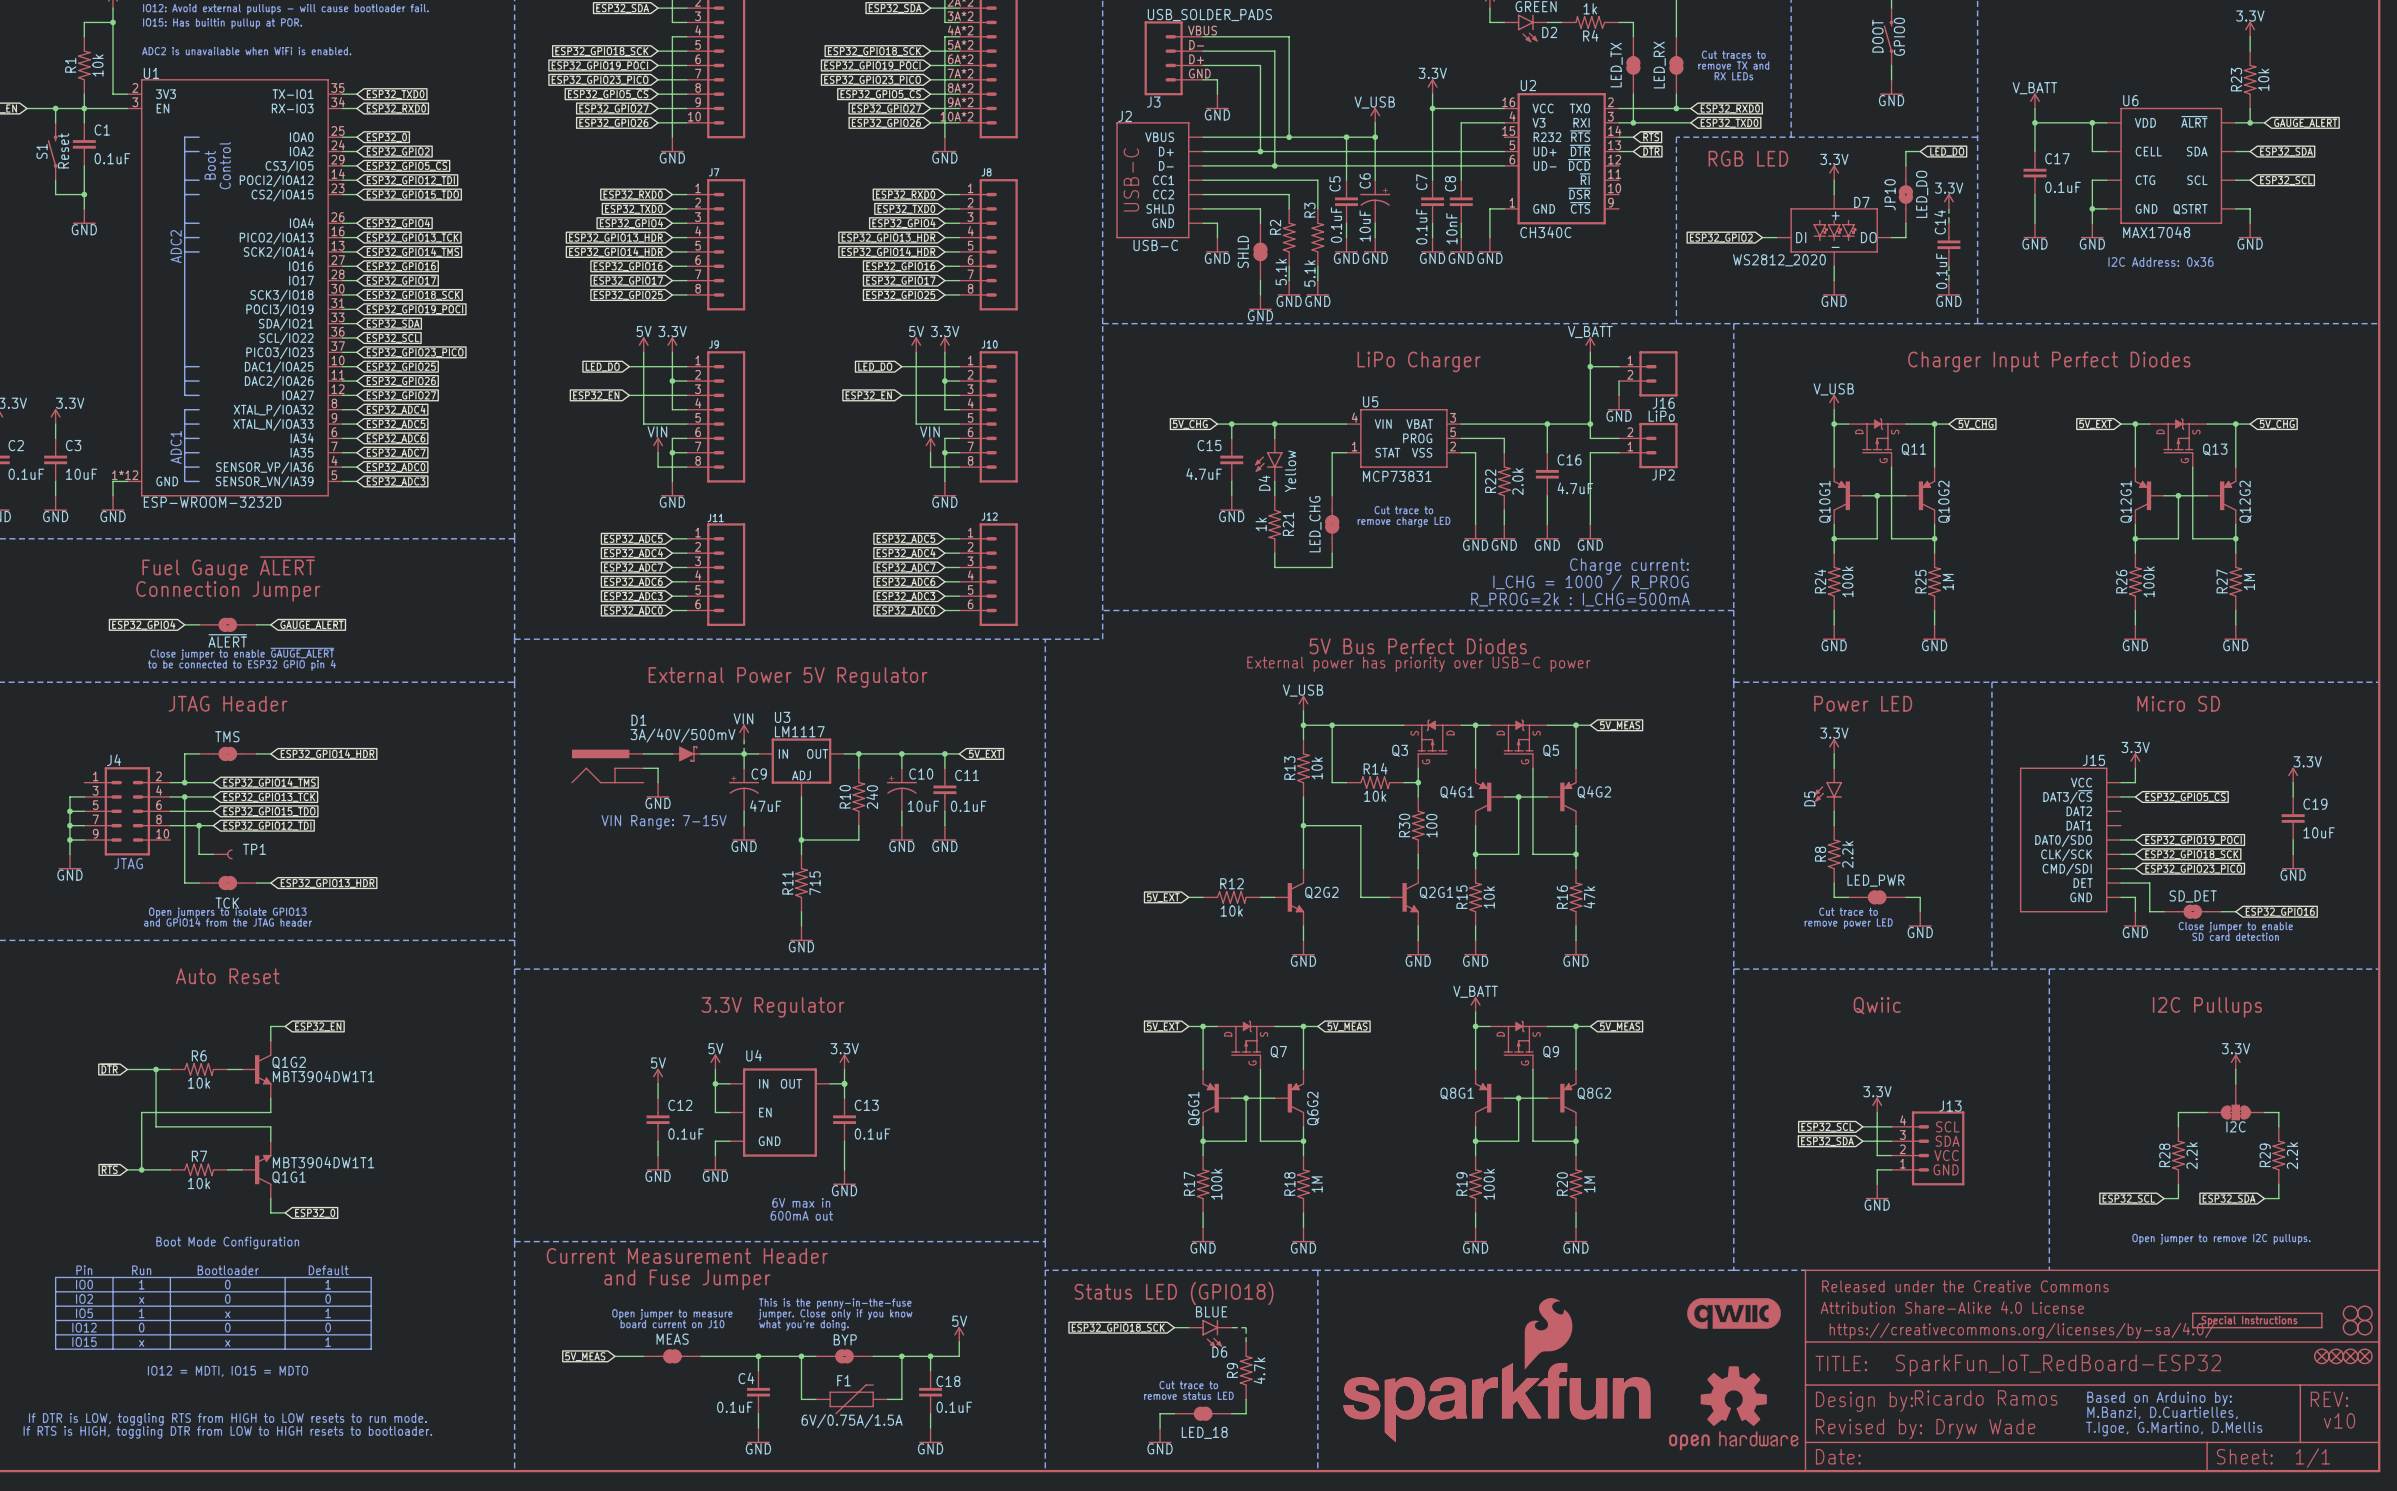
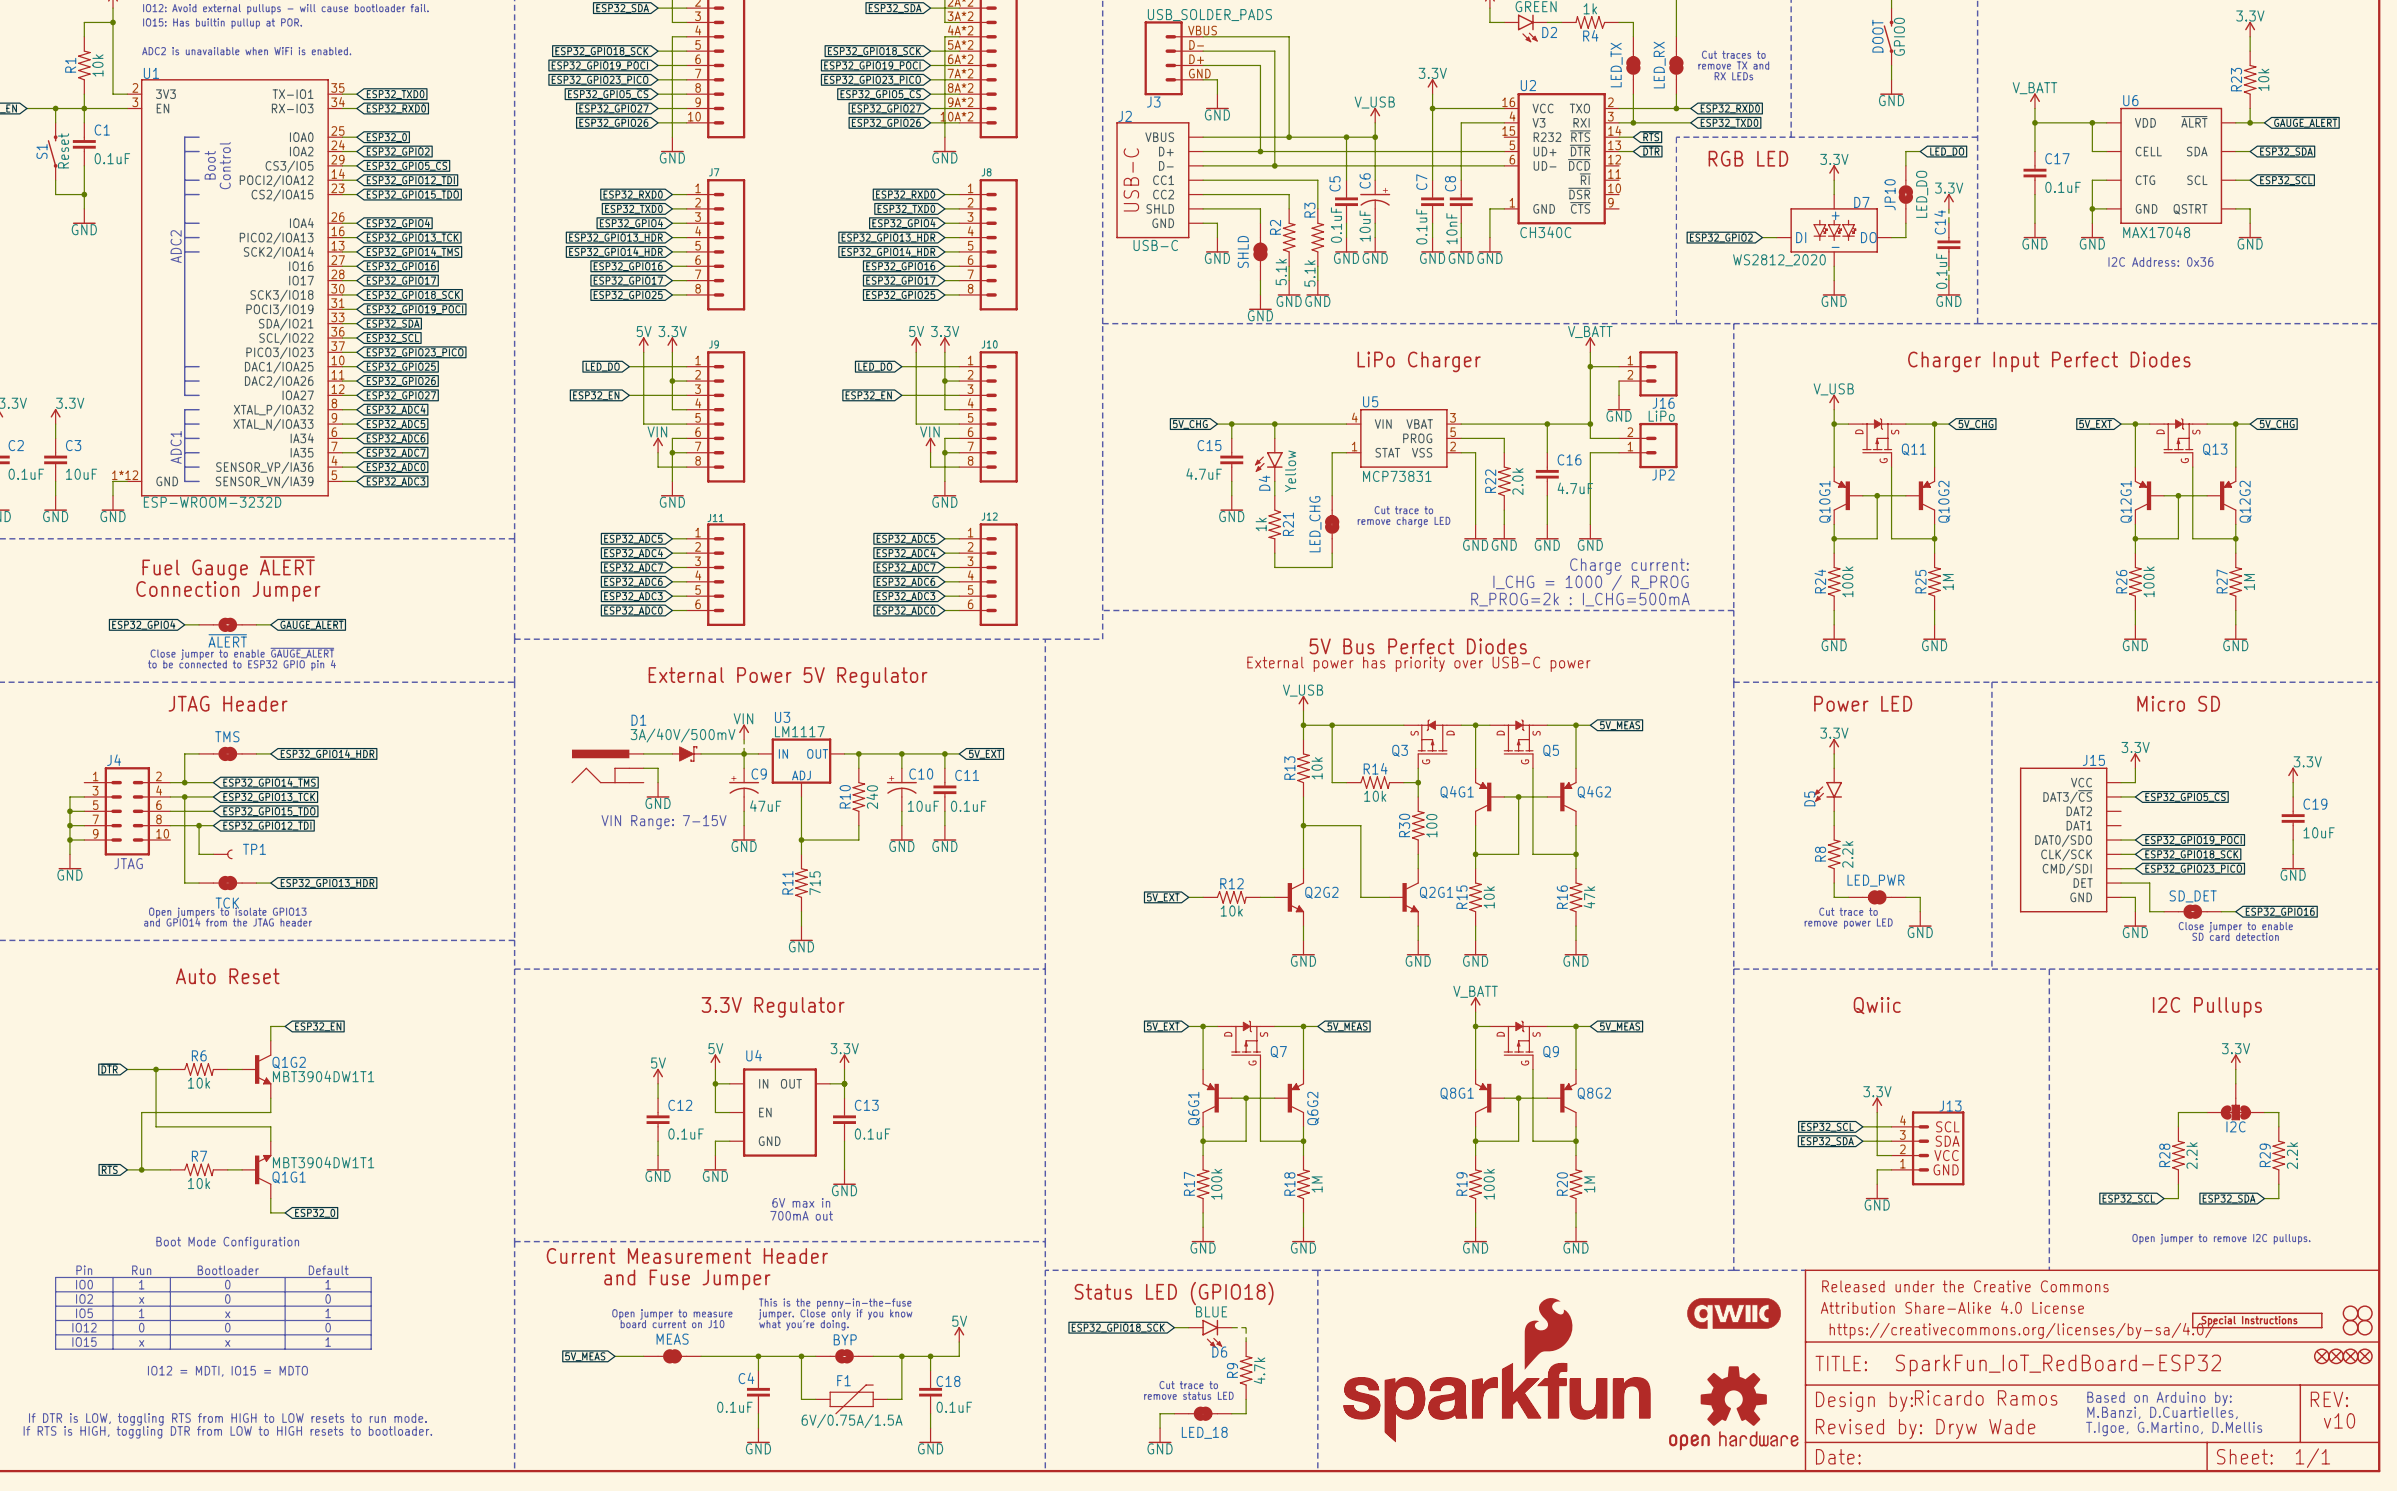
text: 600mA out (801, 1215) -> 700mA out (801, 1215)

